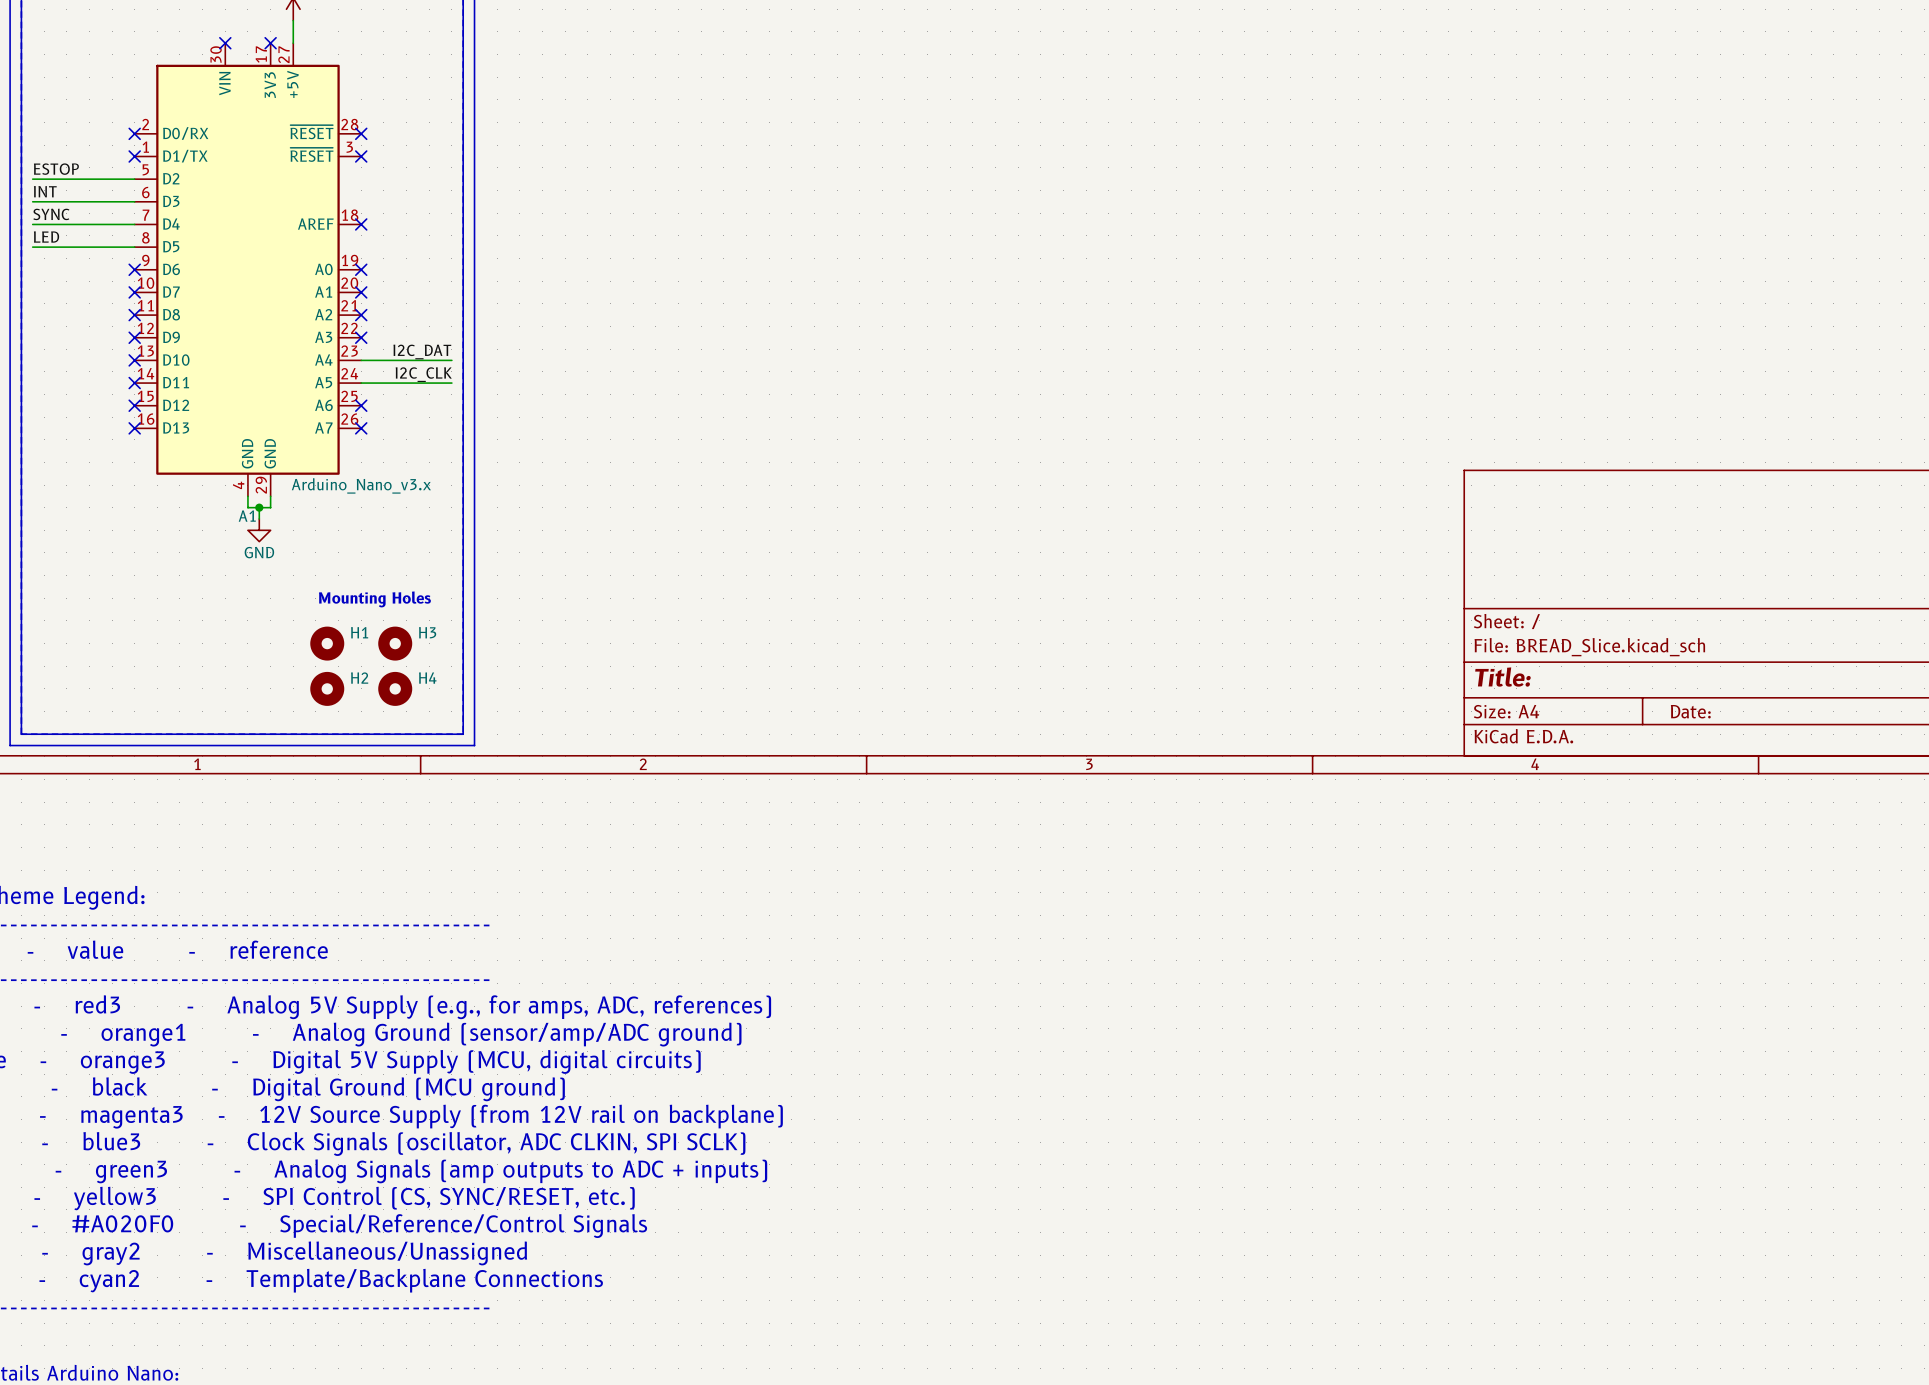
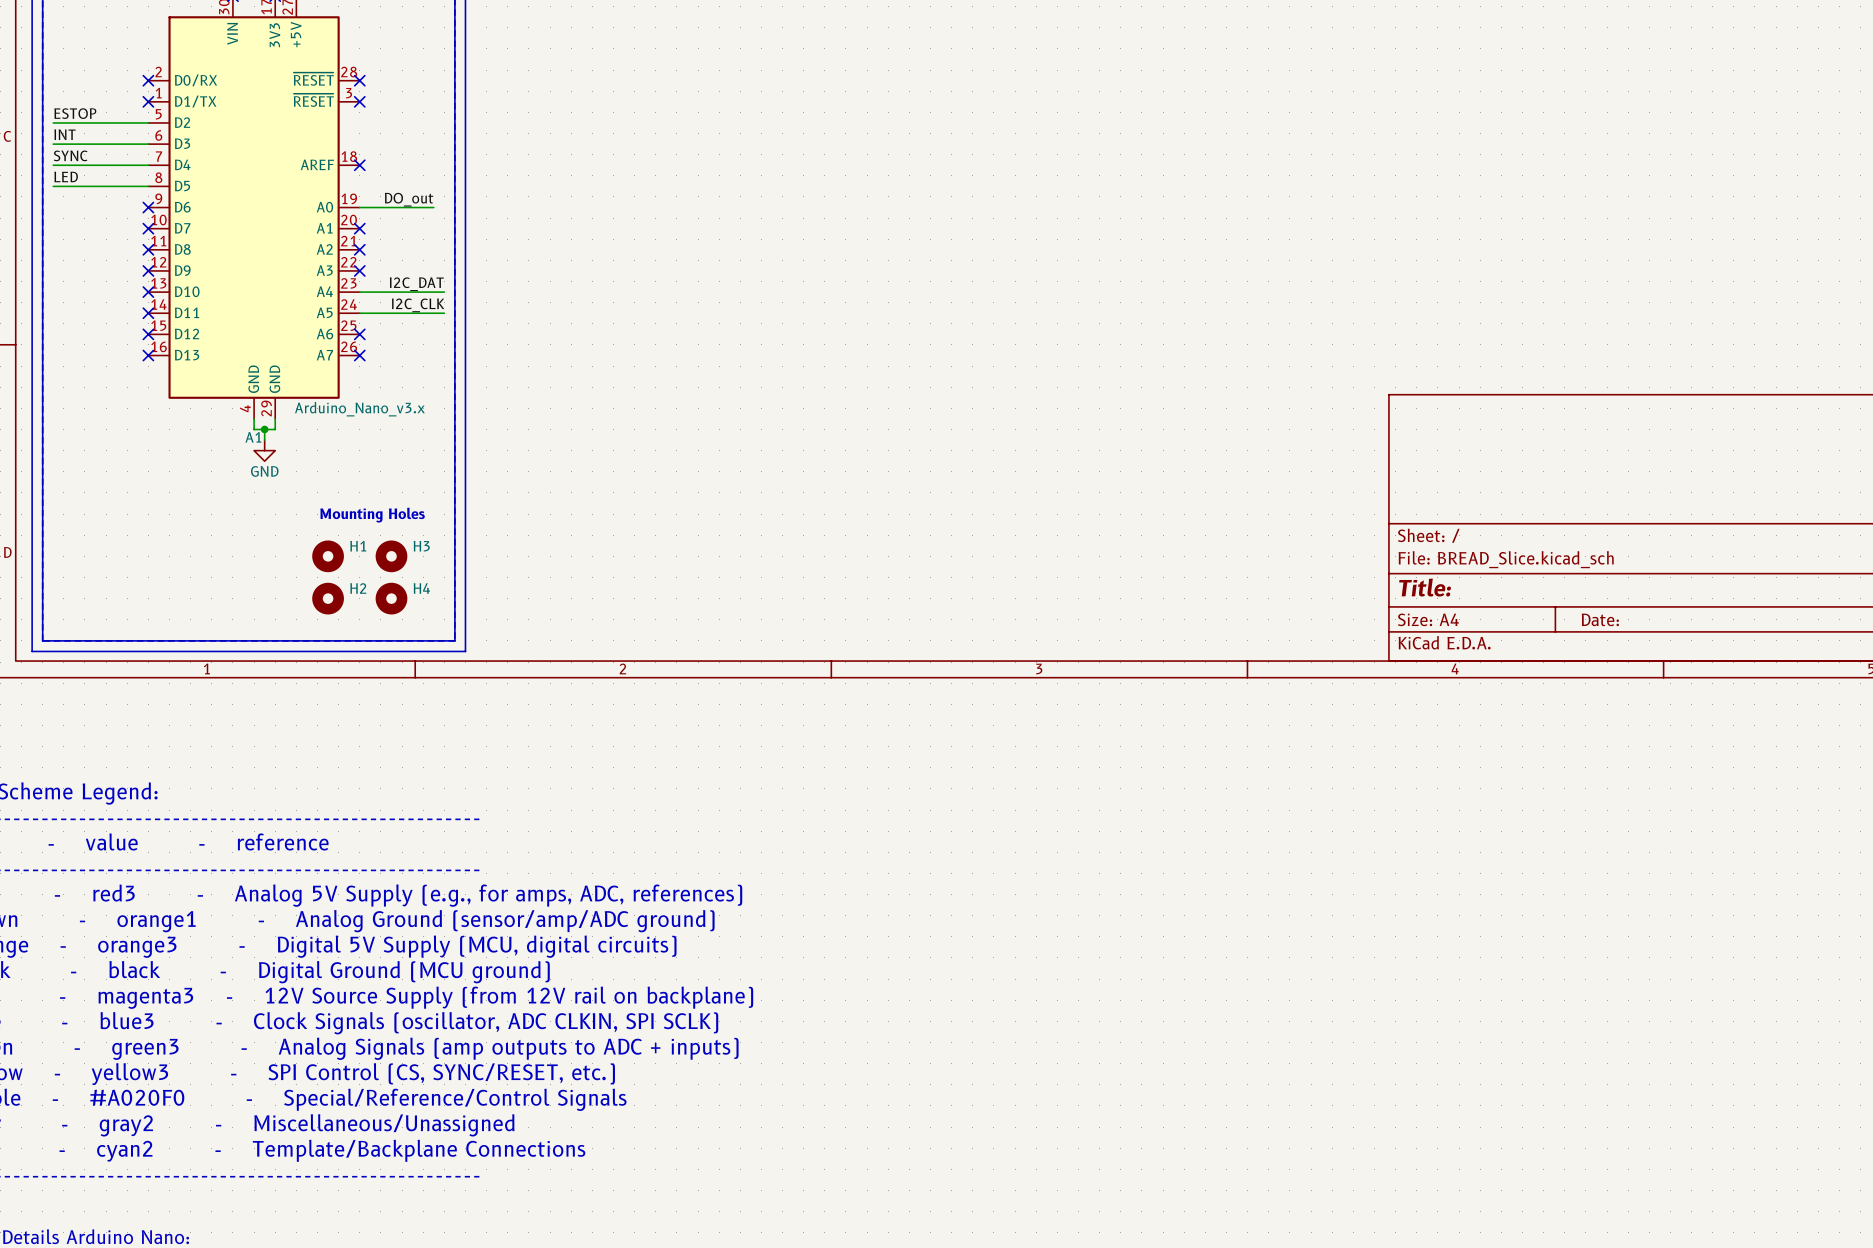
label: none -> DO_out (409, 199)
wire: none -> (359, 207) (433, 207)
no-connect mark: (361, 269) -> none

